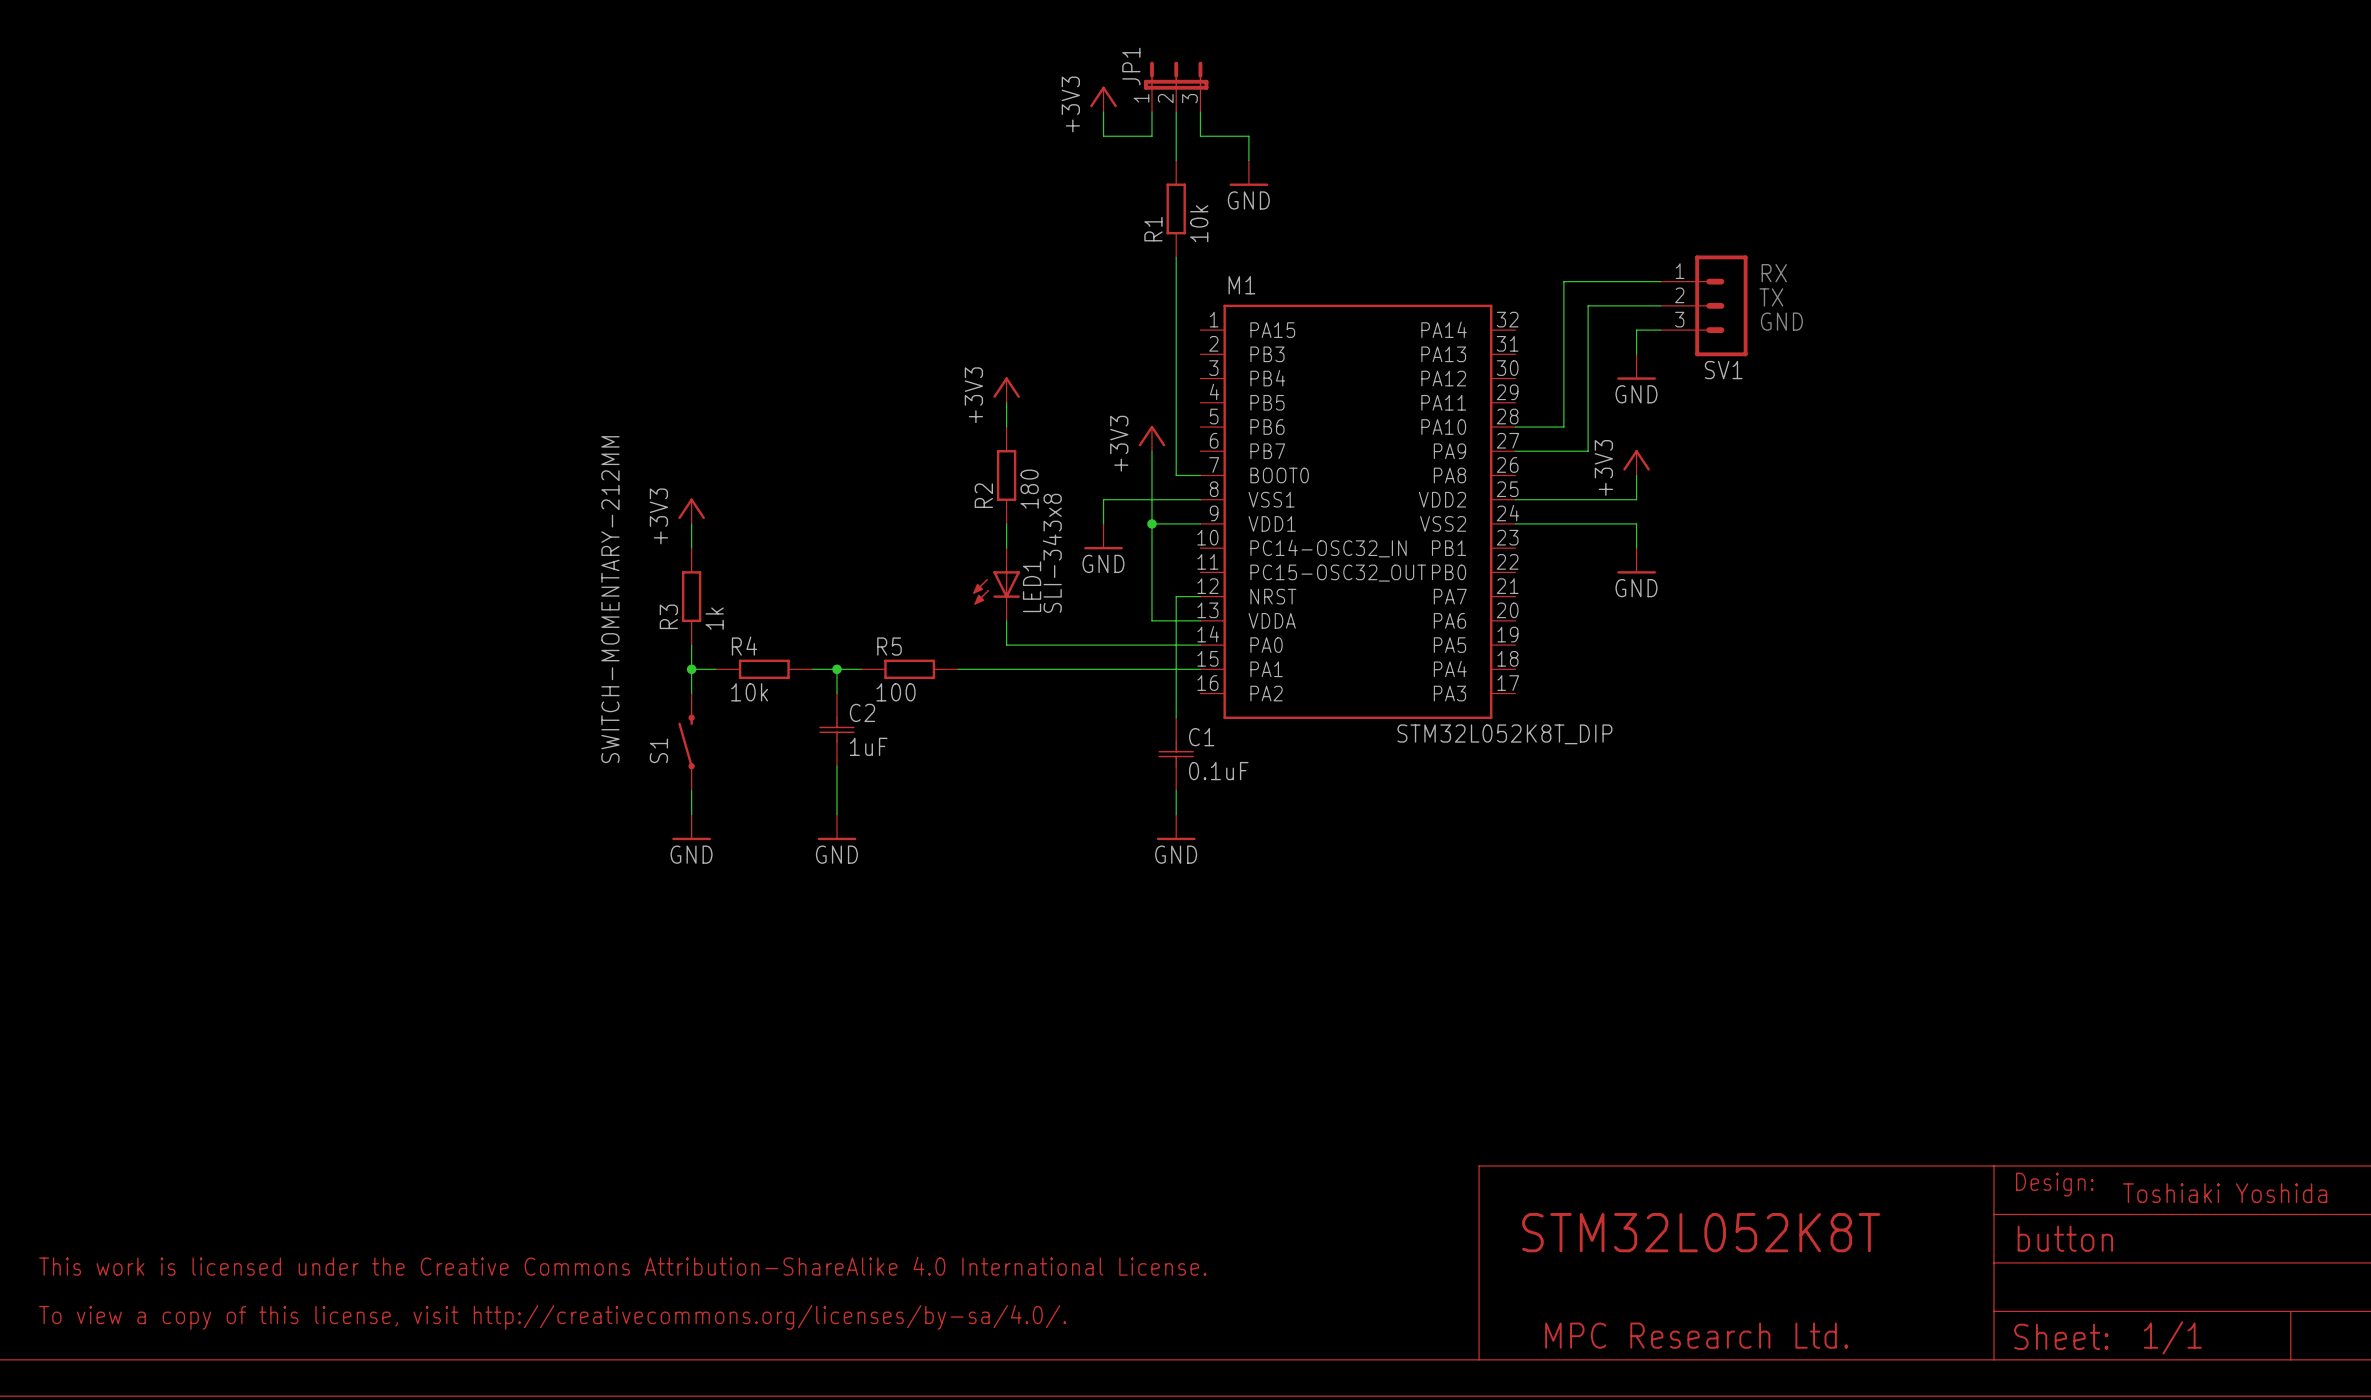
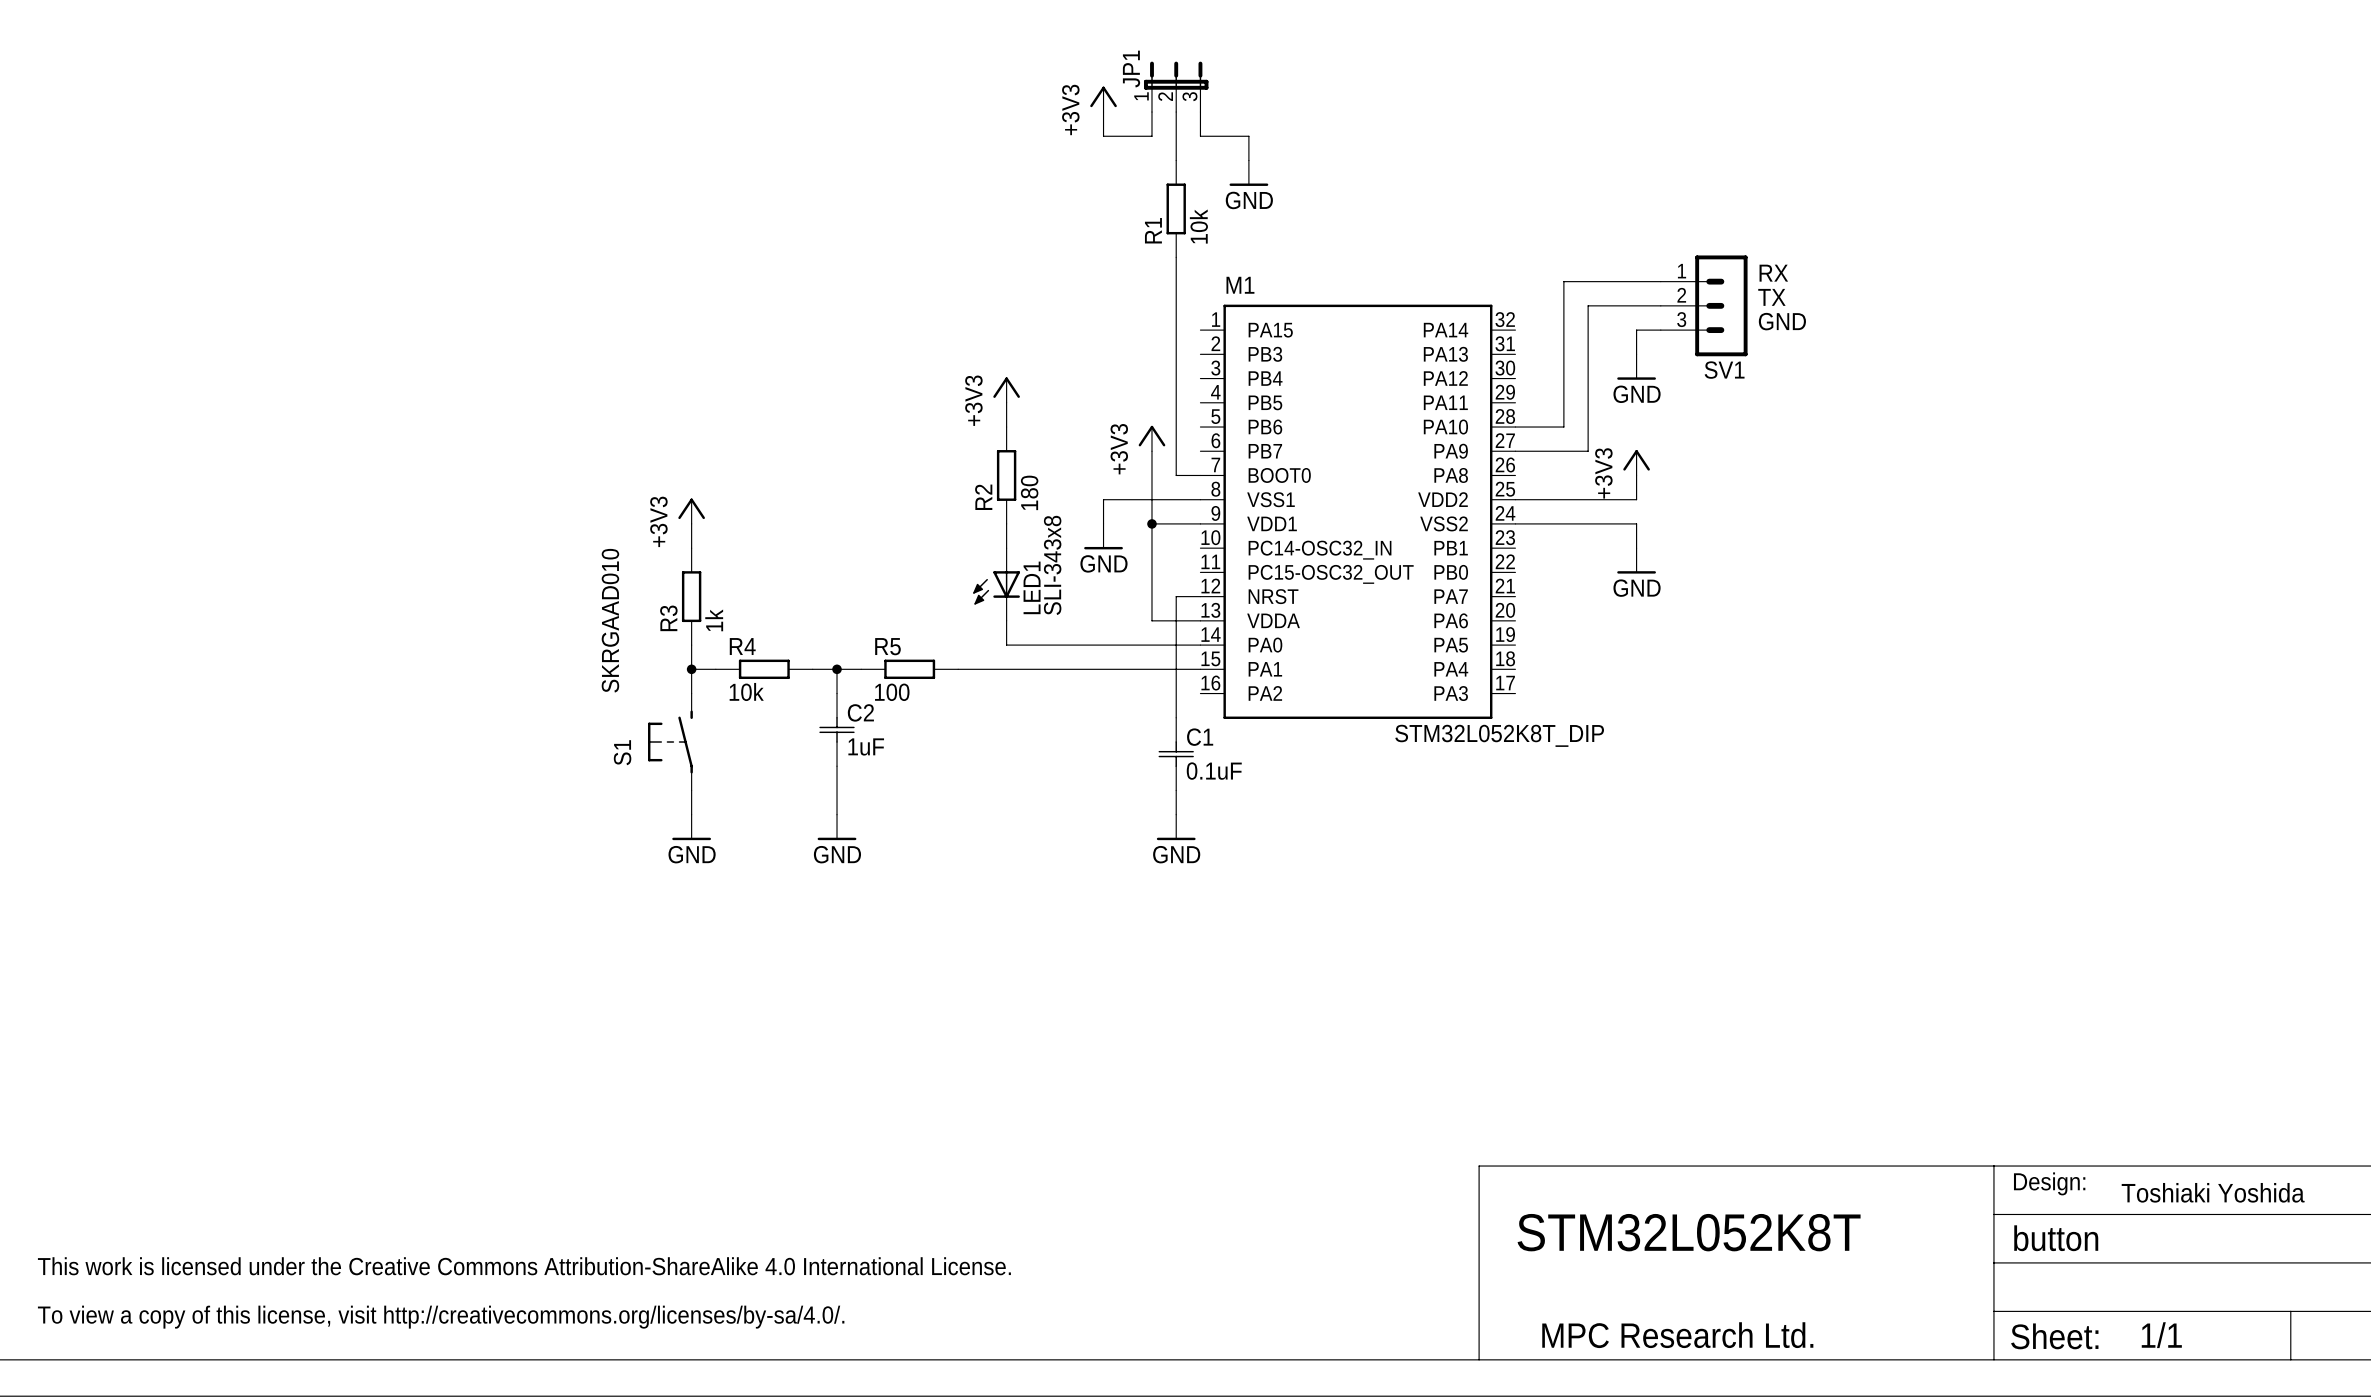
S1 value: SWITCH-MOMENTARY-212MM (610, 599) -> SKRGAAD010 (610, 620)
S1 symbol: [678, 693, 695, 791] -> [648, 693, 693, 791]
S1 name position: S1 (658, 750) -> S1 (622, 752)

